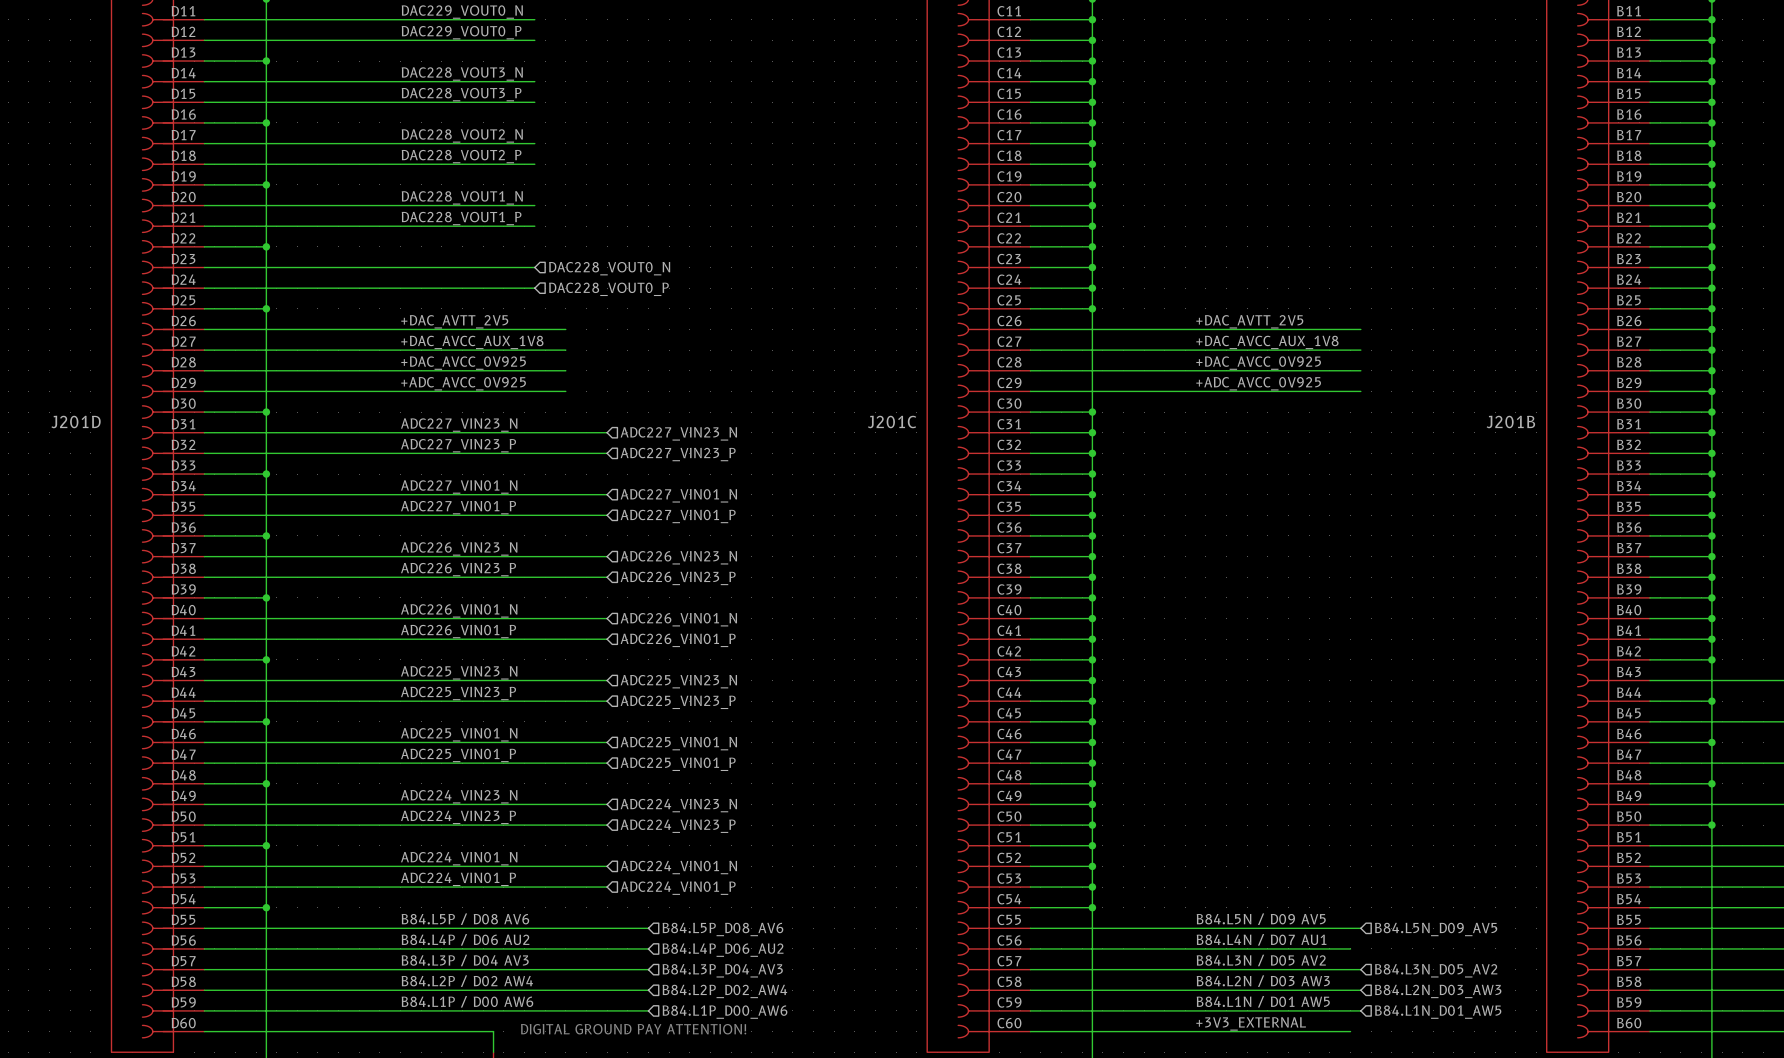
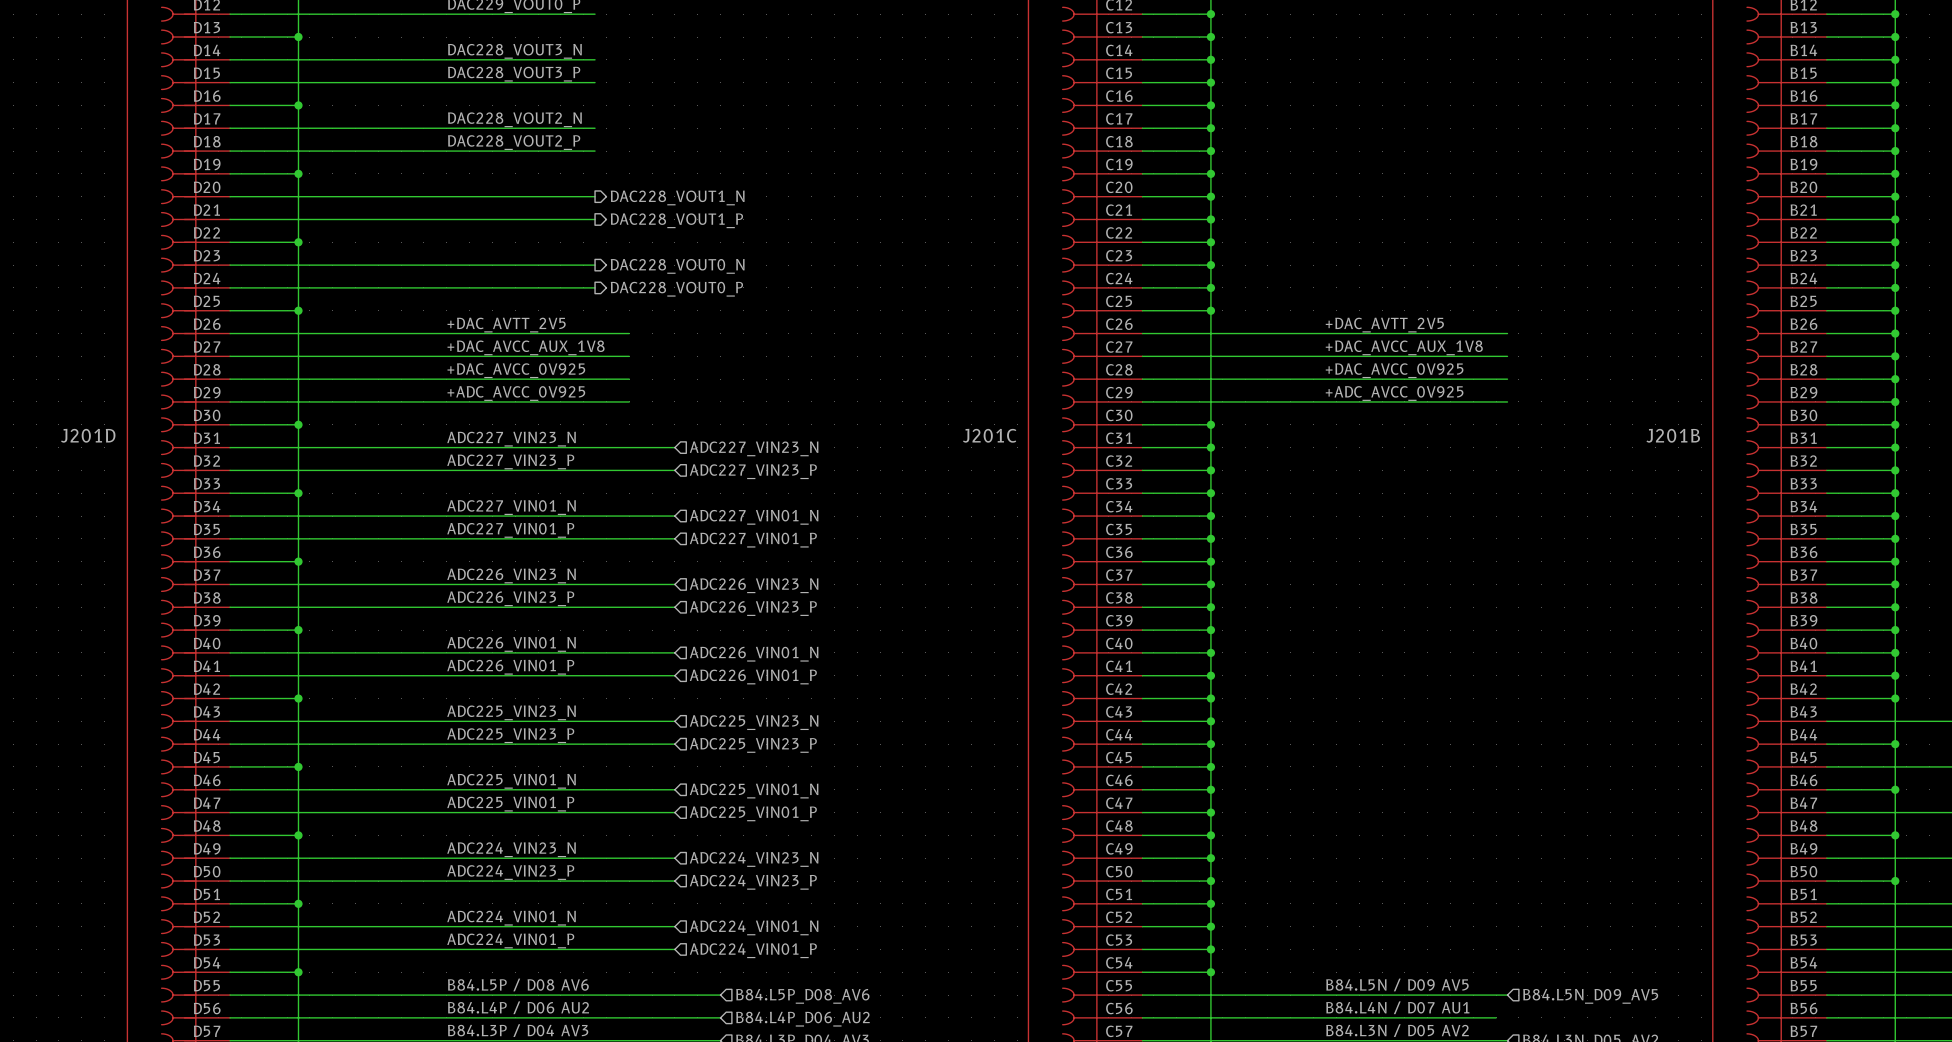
label: DAC228_VOUT1_N (462, 197) -> none
hierarchical label: none -> DAC228_VOUT1_N (677, 197)
label: DAC228_VOUT1_P (461, 218) -> none
hierarchical label: none -> DAC228_VOUT1_P (676, 220)
hierarchical label shape: input (609, 268) -> output (677, 266)
hierarchical label shape: input (608, 289) -> output (676, 289)

